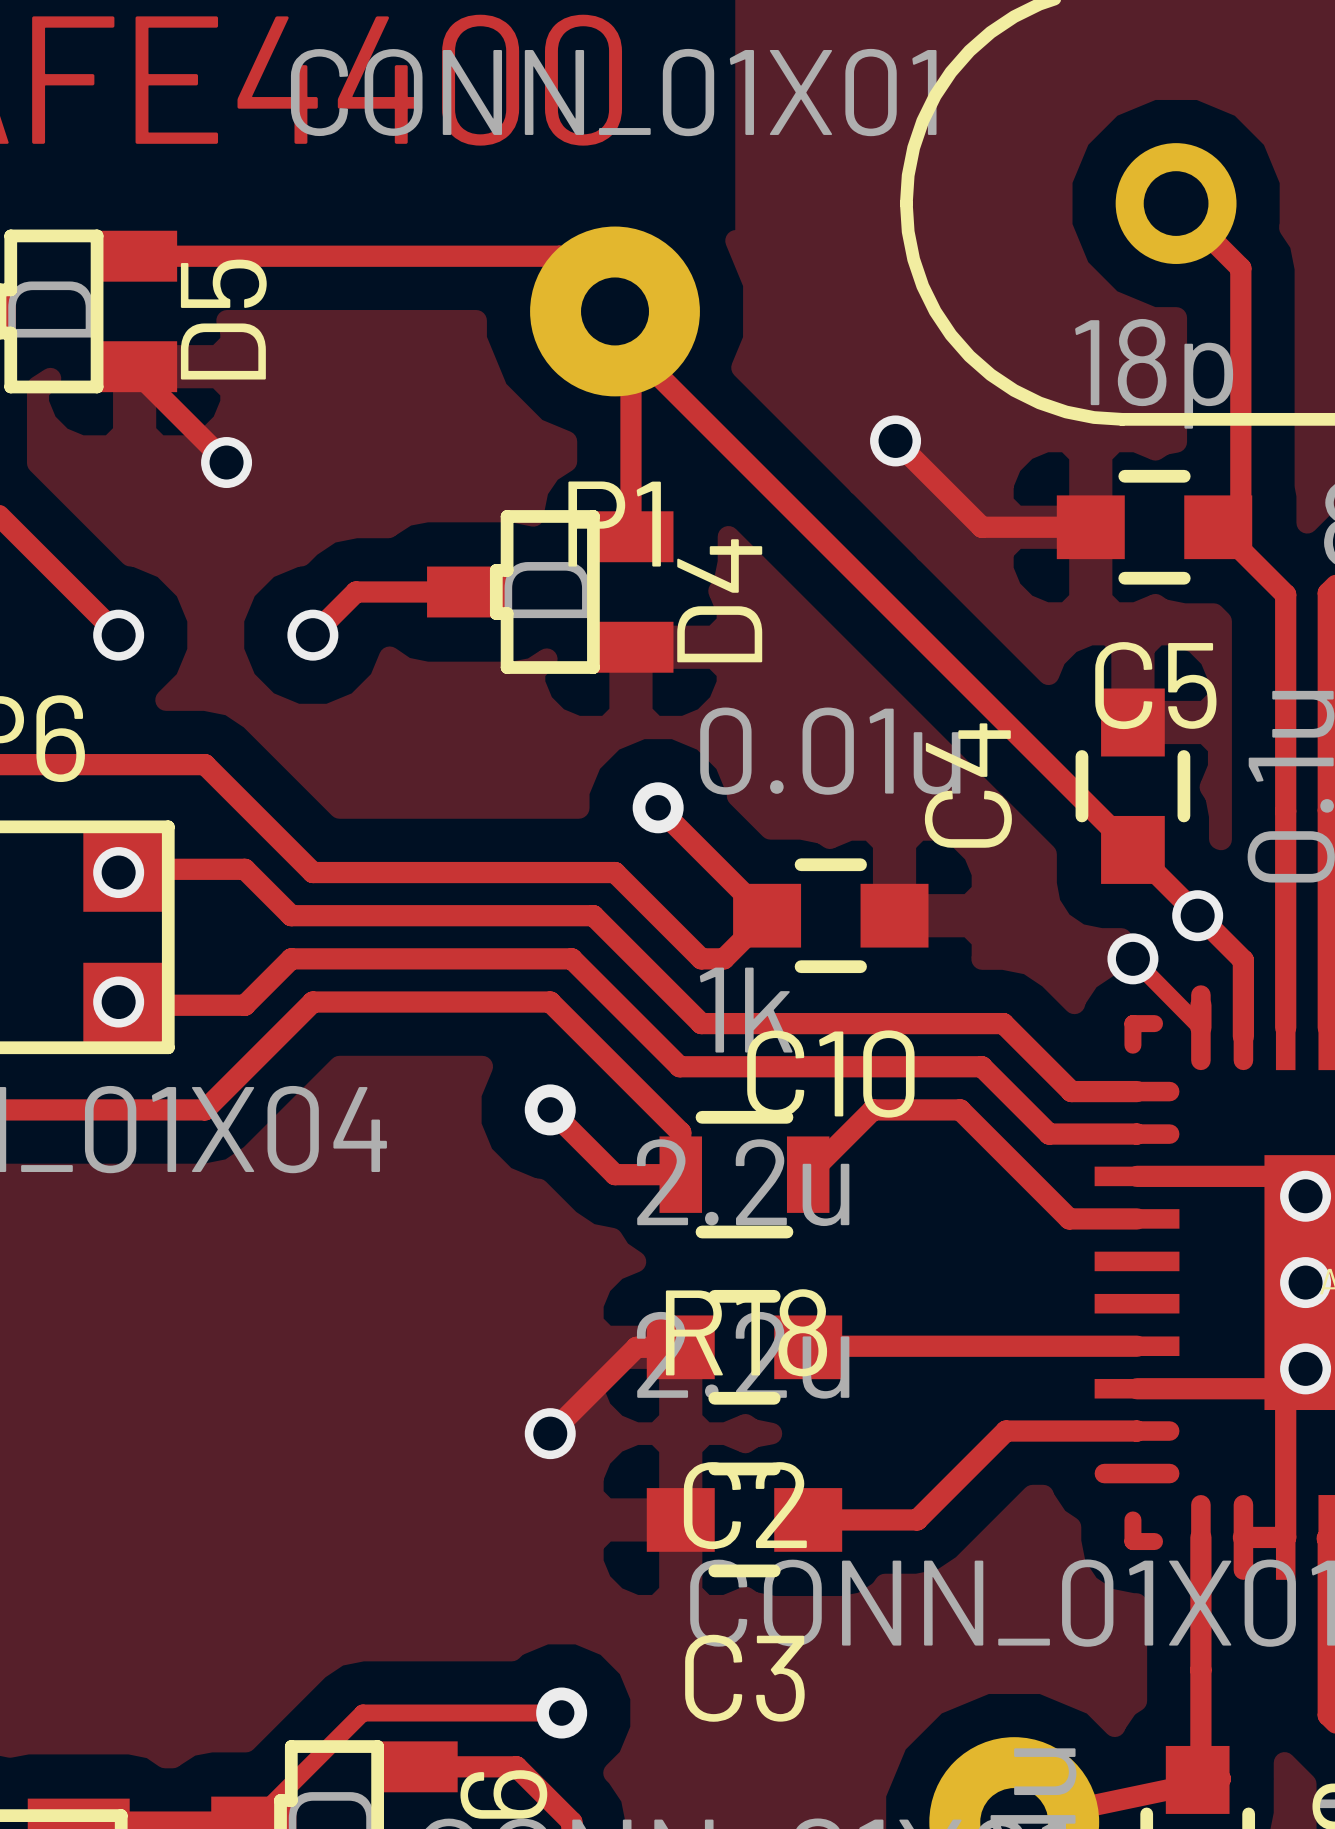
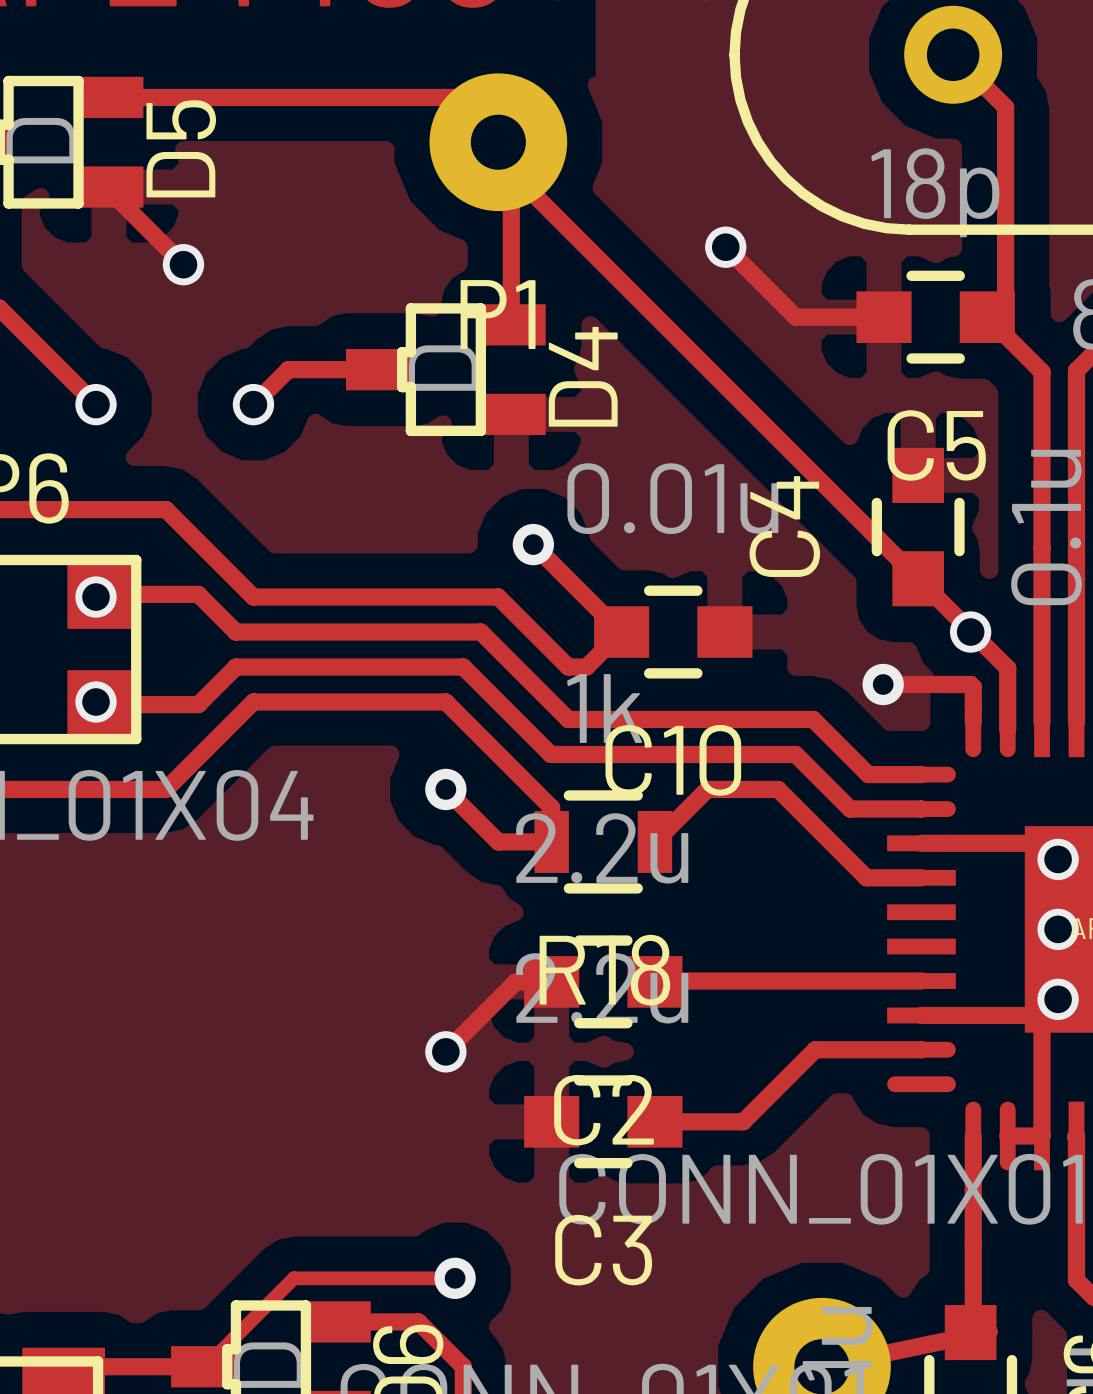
track: (1132, 958) (1200, 1027) -> none
via position: (1132, 958) -> (883, 684)
track: none -> (883, 684) (970, 684) (973, 687) (973, 704)
track: (1154, 1023) (1132, 1023) (1132, 1045) -> none
track: (1132, 1519) (1132, 1541) (1154, 1541) -> none

